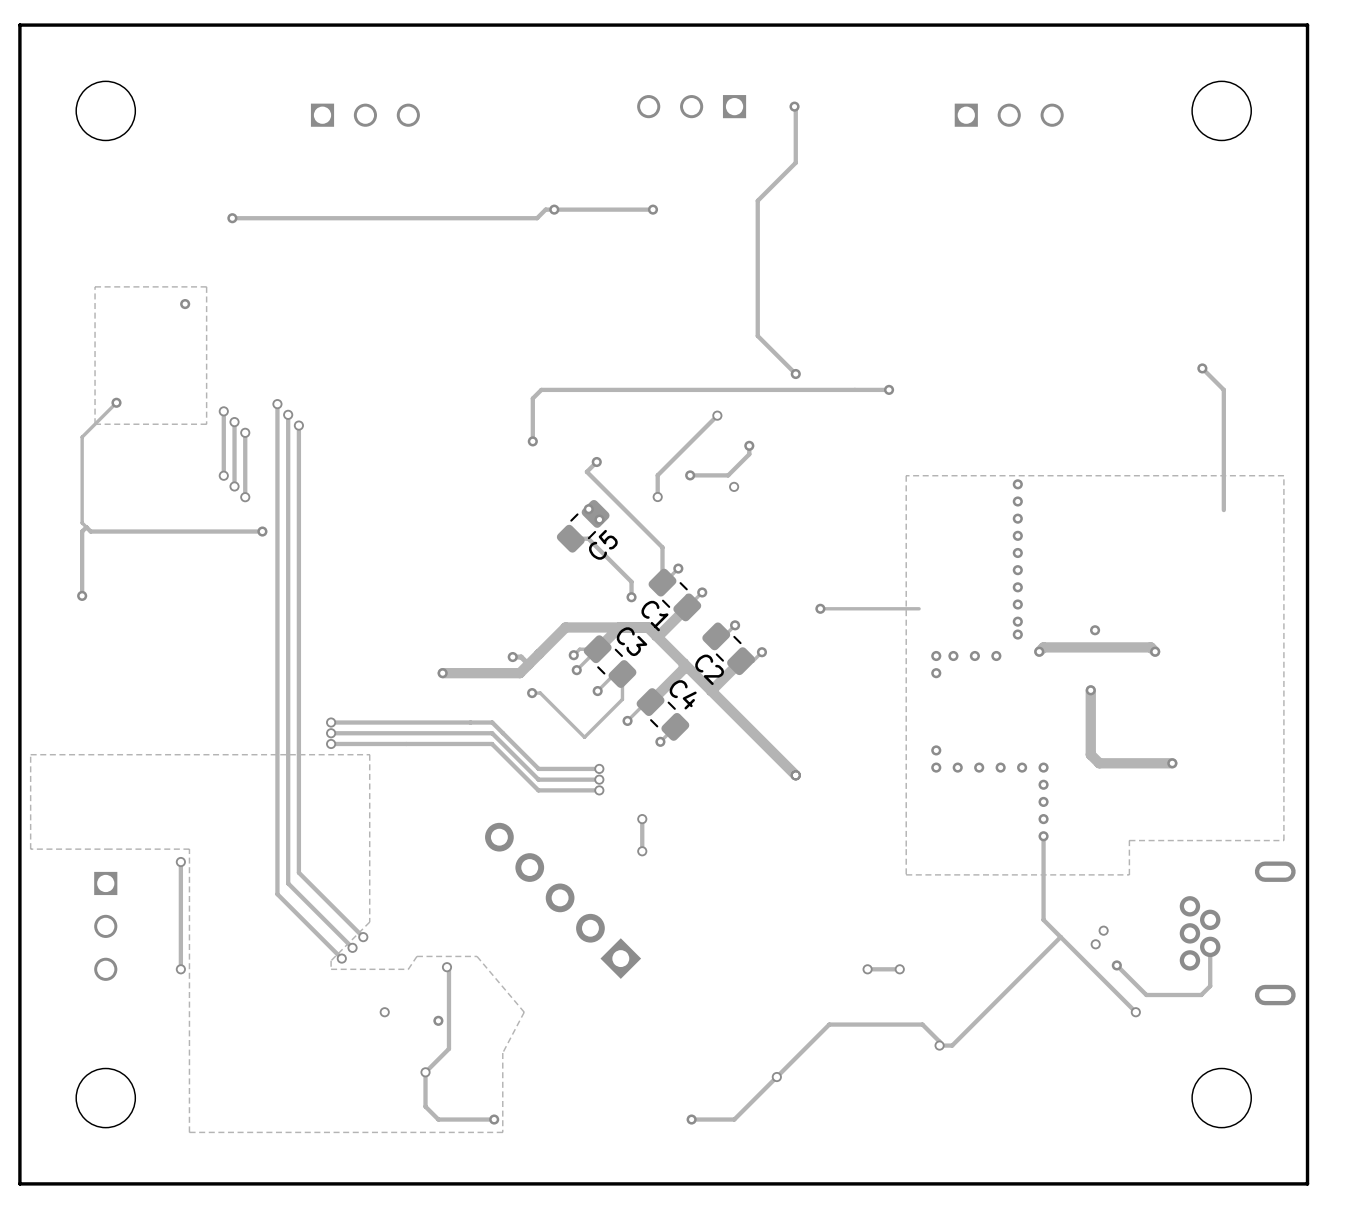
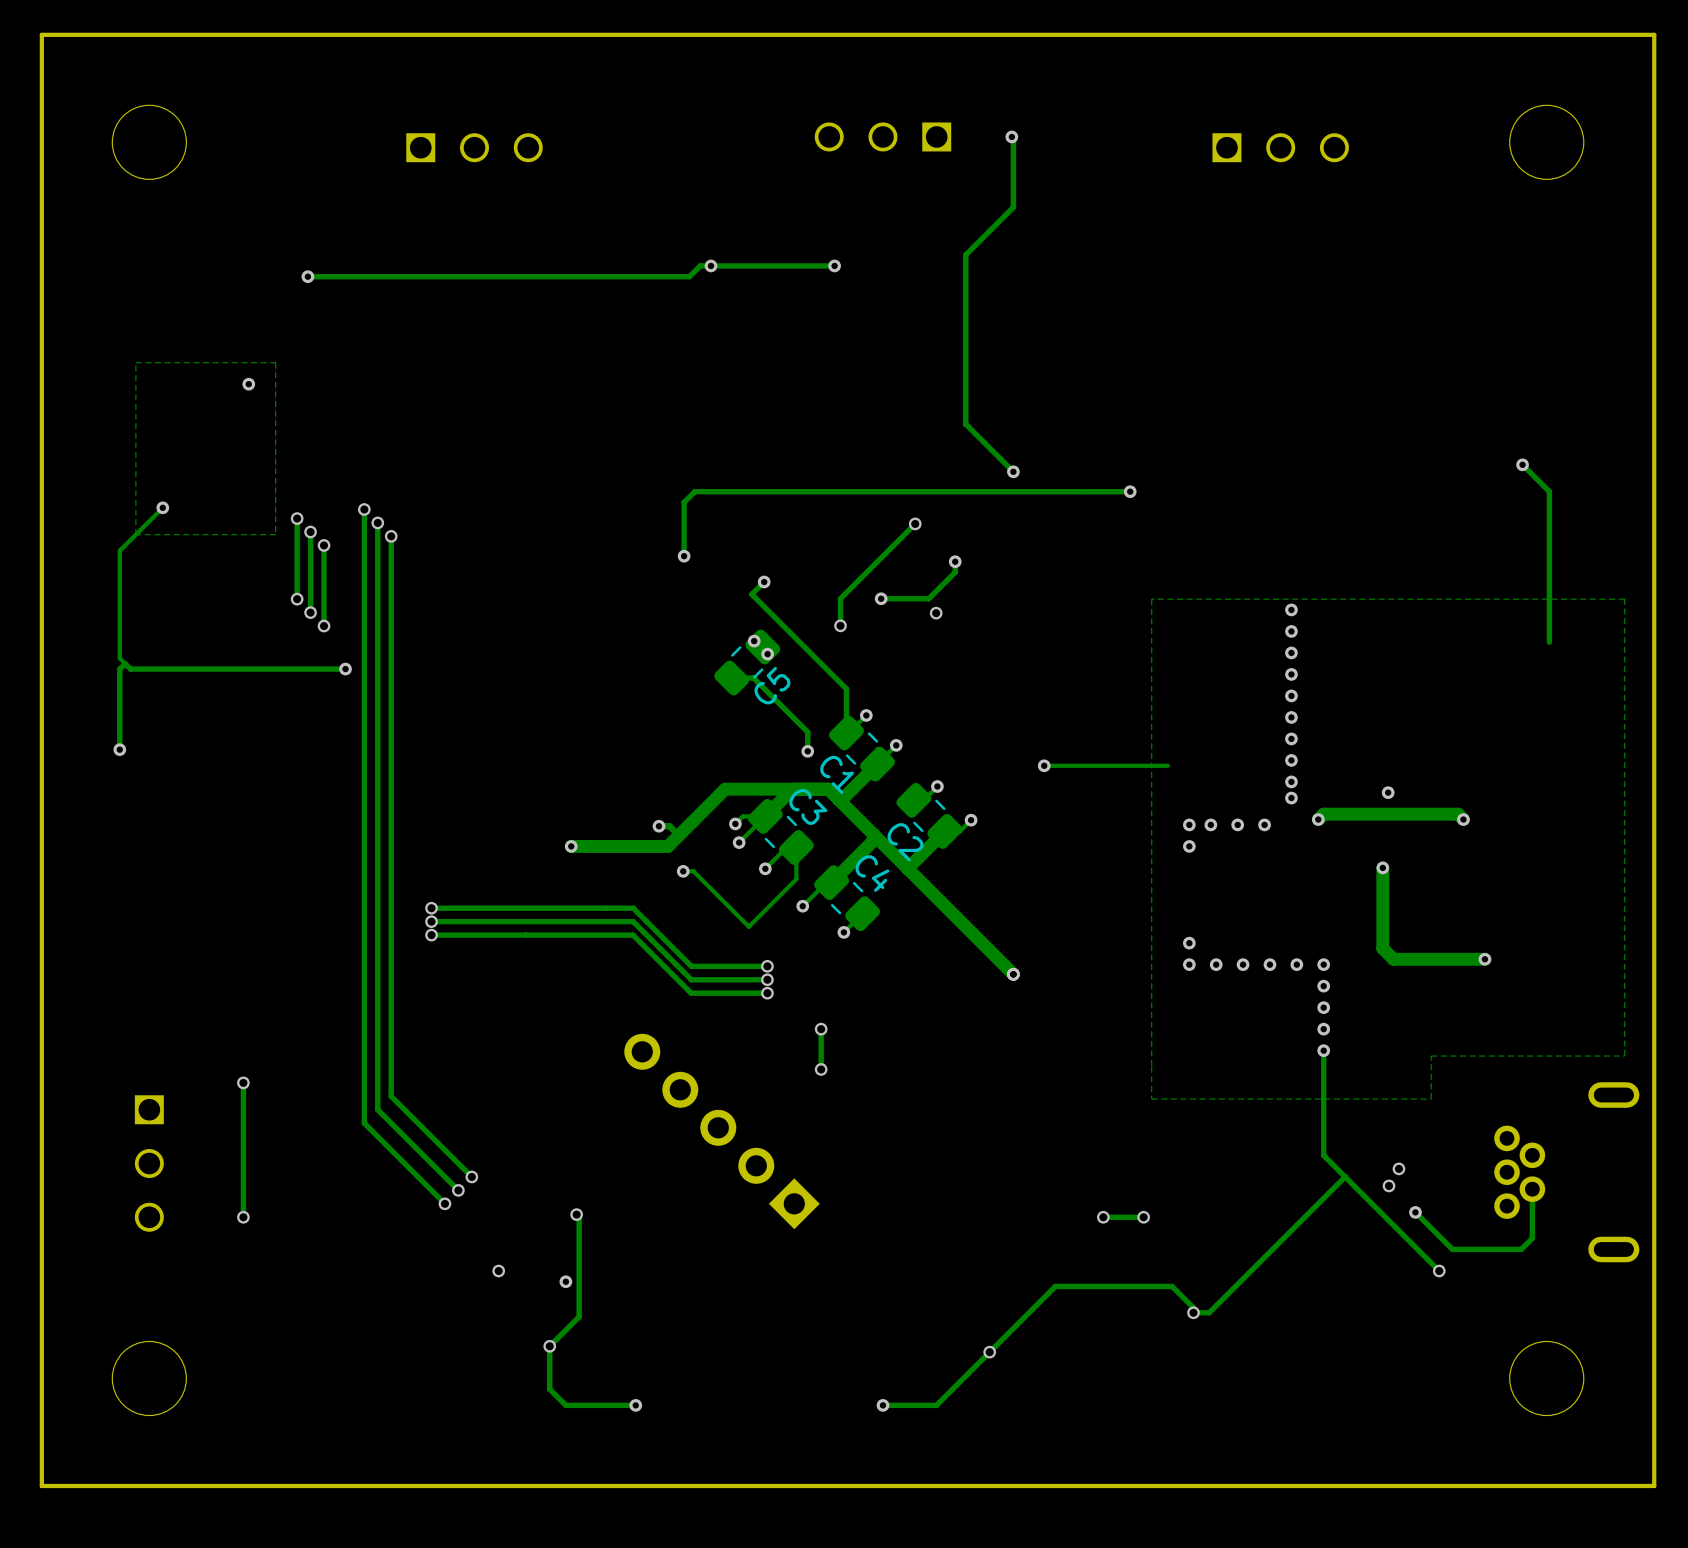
zone outline: (369, 754) (30, 754) (30, 849) (189, 849) (189, 1132) (502, 1132) (502, 1053) (524, 1012) (477, 956) (416, 956) (408, 969) (331, 969) (331, 960) (369, 922) (369, 754) -> none

